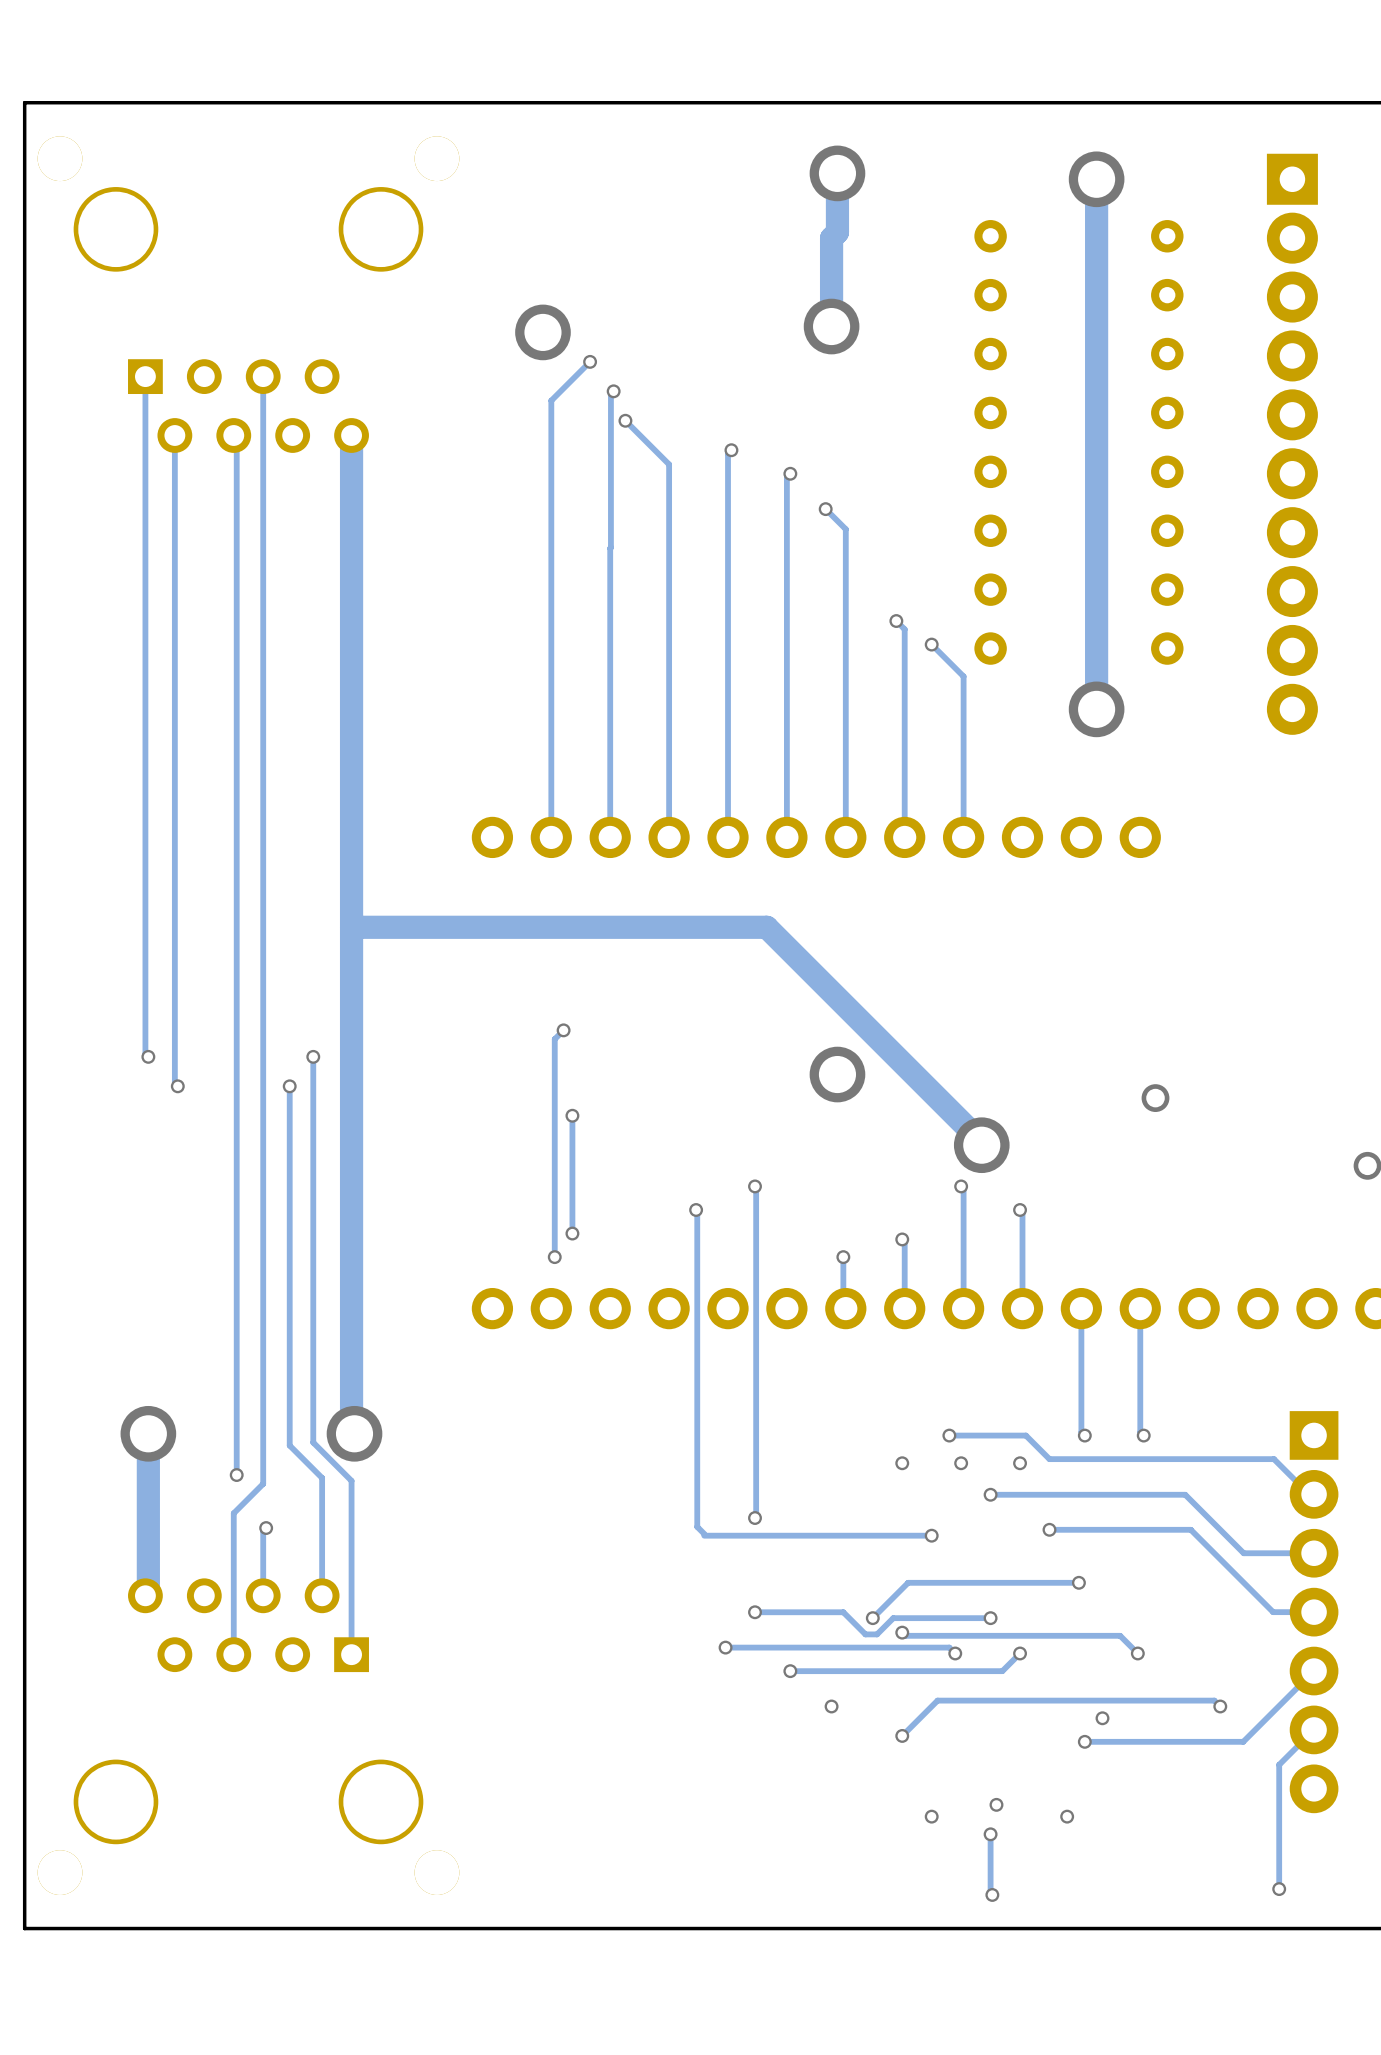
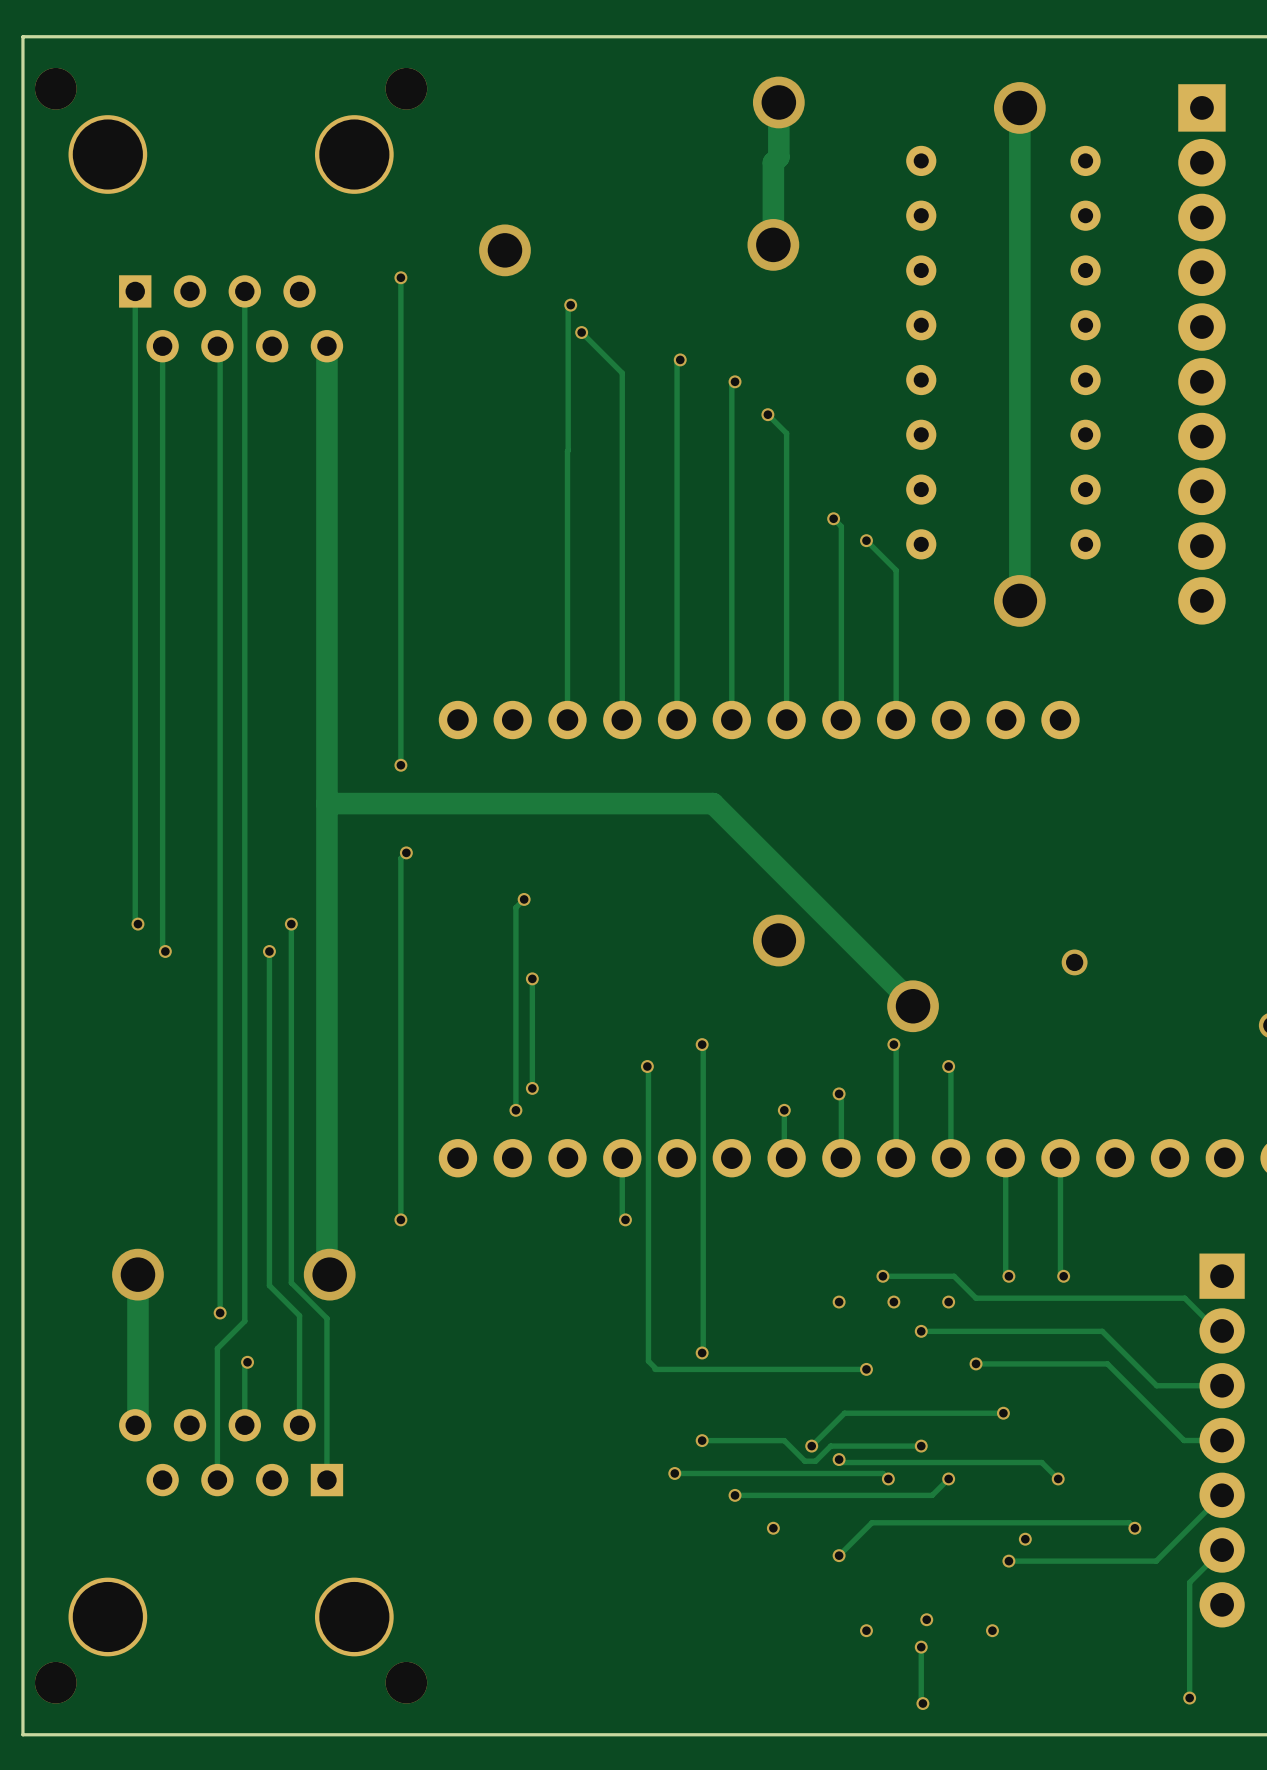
track: none -> (400, 277) (400, 765)
via: none -> (400, 277)
track: (590, 361) (551, 400) (551, 837) -> none
via: (590, 361) -> none
via: none -> (400, 765)
track: none -> (406, 852) (400, 858) (400, 1219)
via: none -> (406, 852)
track: none -> (622, 1158) (622, 1216) (625, 1219)
via: none -> (400, 1219)
via: none -> (625, 1219)

